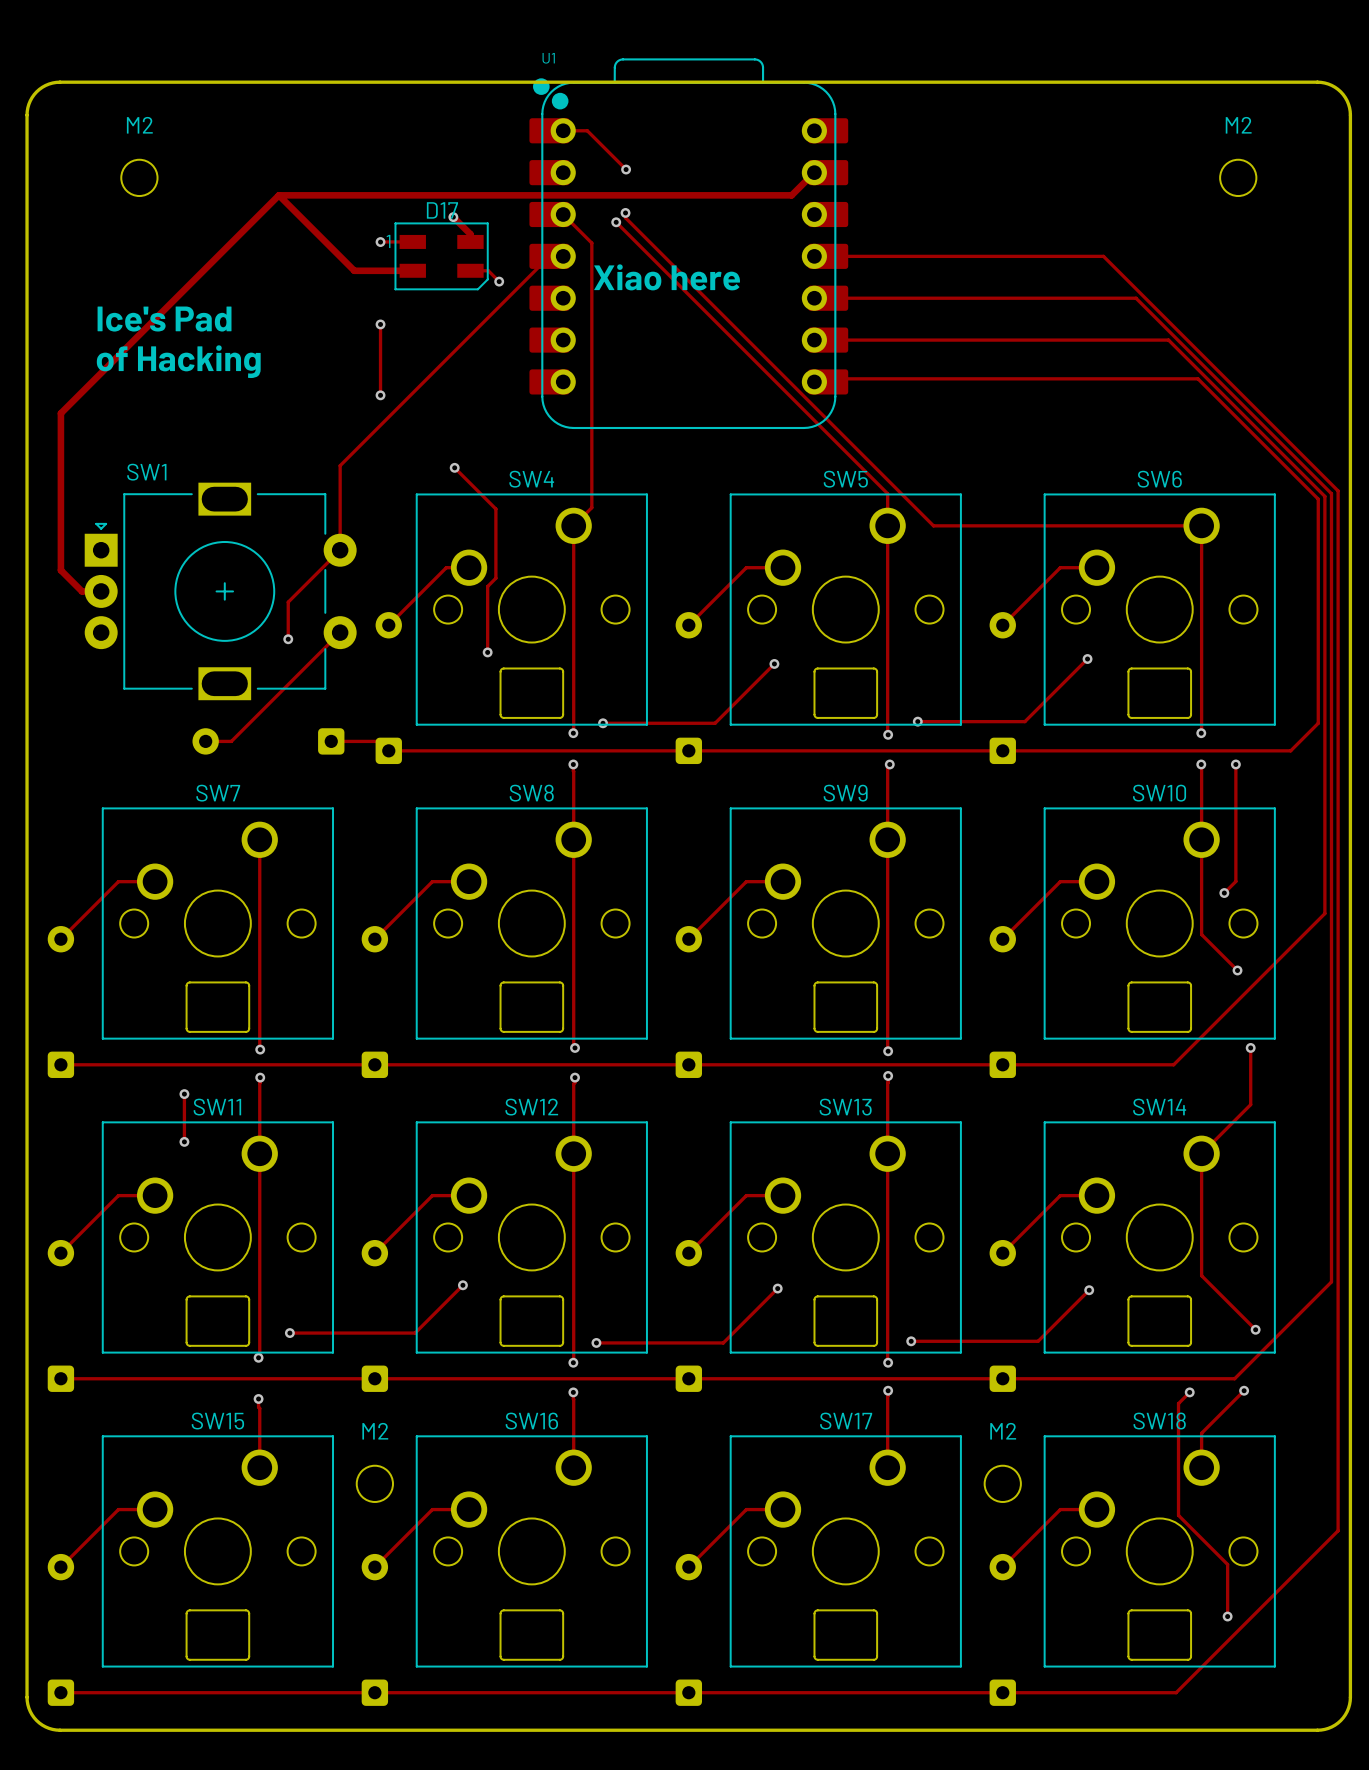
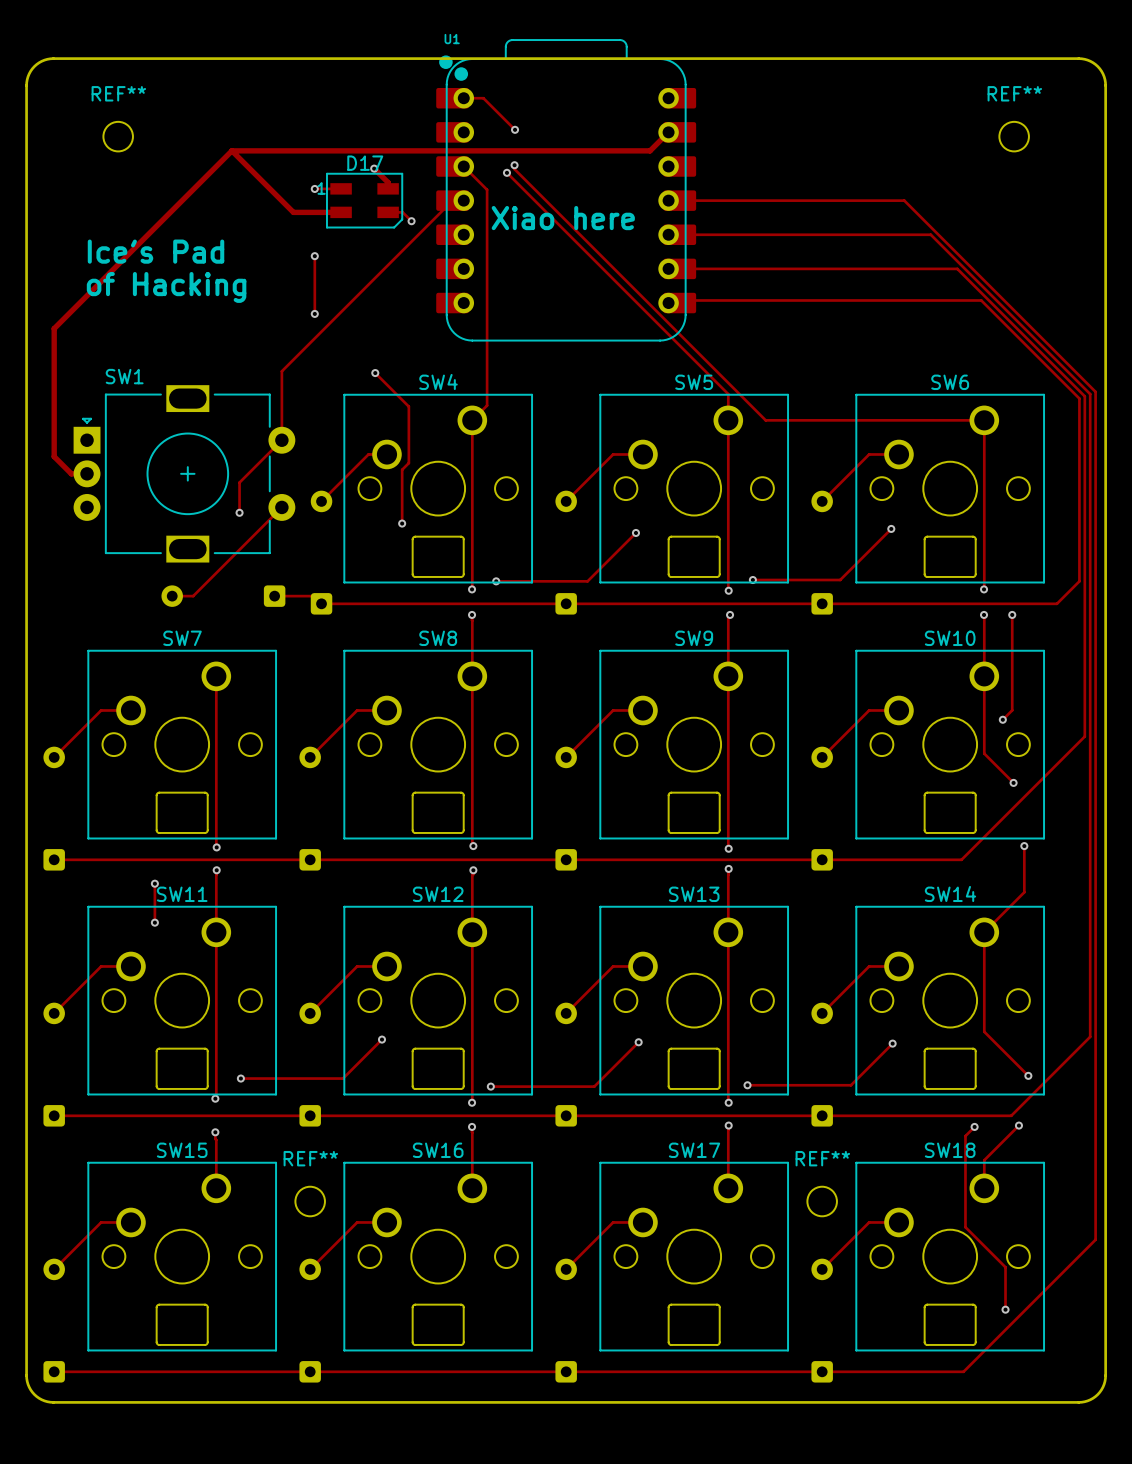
M2 name: M2 (139, 125) -> REF** (118, 93)
M2 name: M2 (1238, 125) -> REF** (1014, 93)
M2 name: M2 (375, 1431) -> REF** (310, 1158)
M2 name: M2 (1003, 1431) -> REF** (822, 1158)

